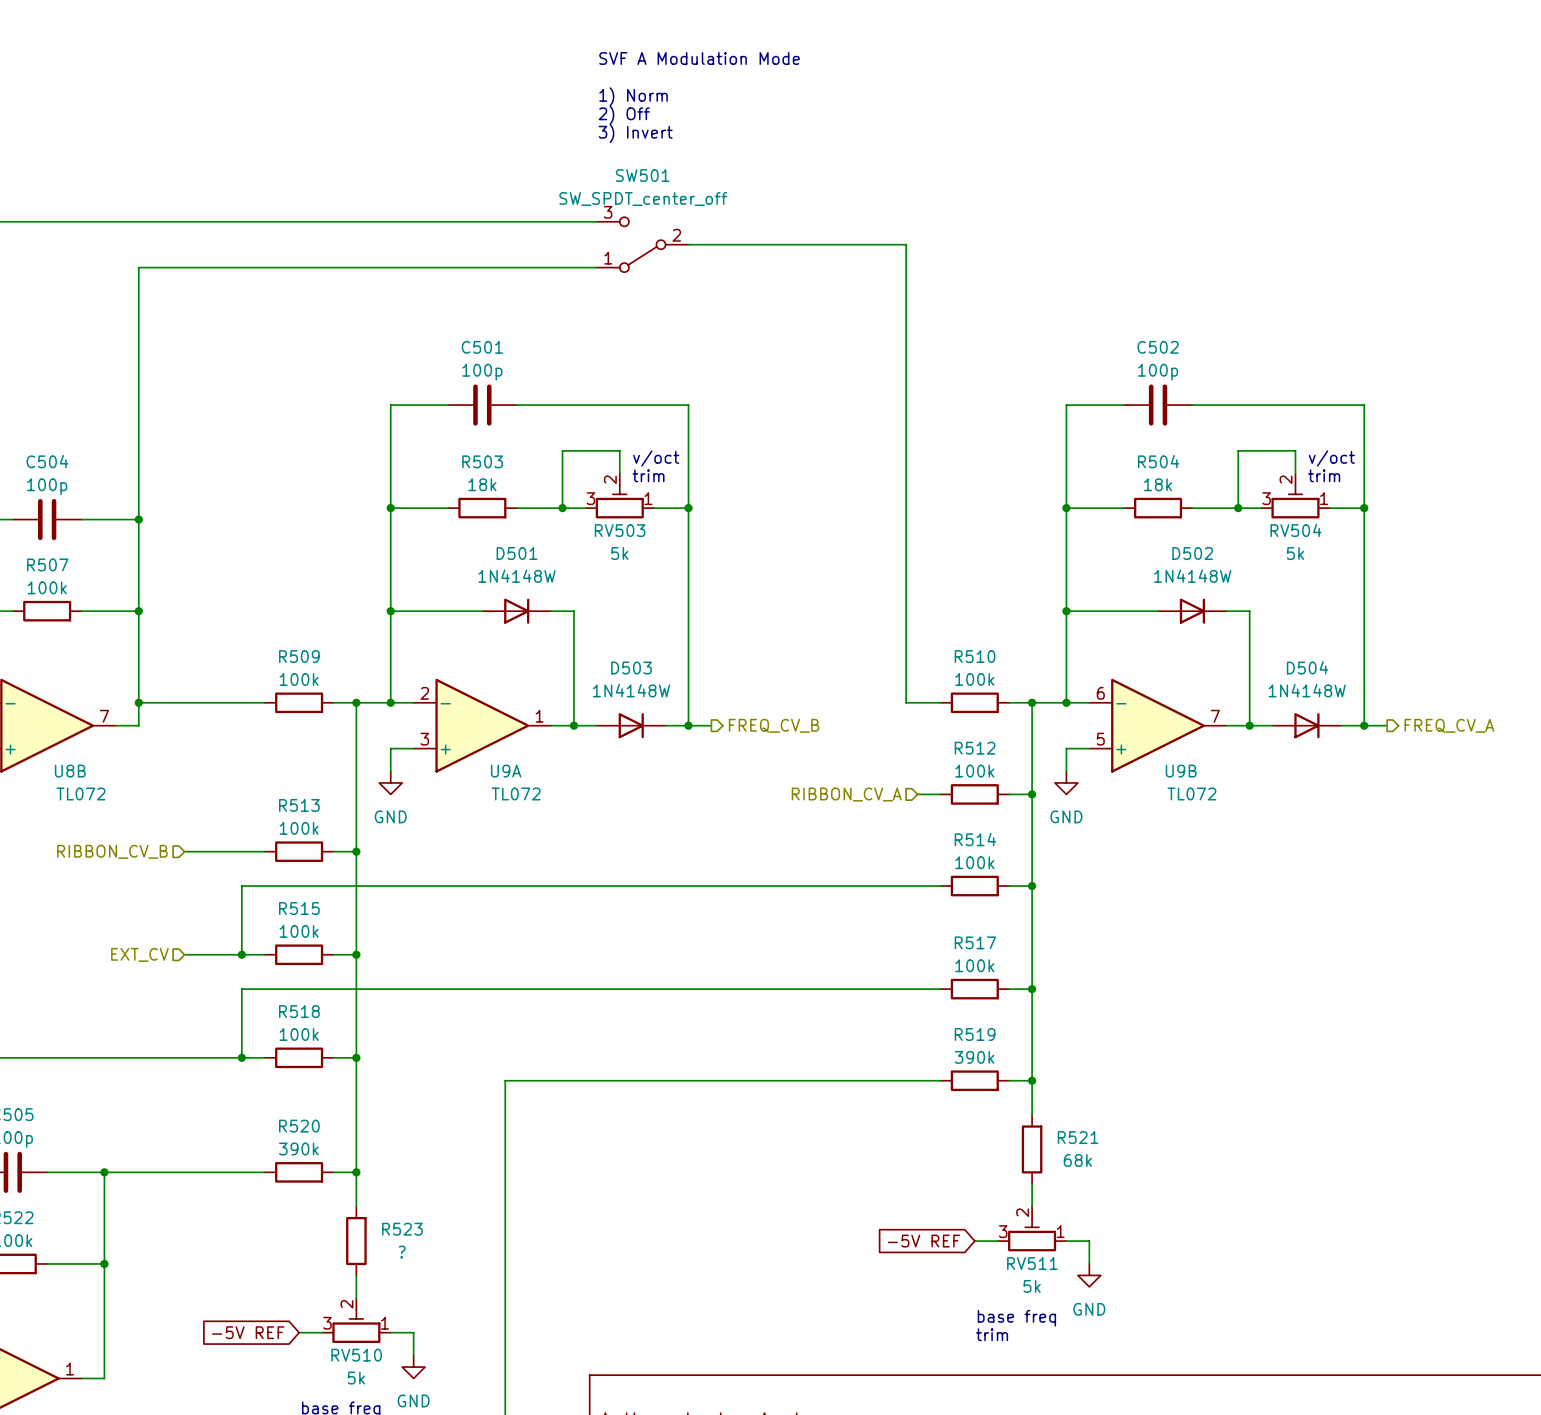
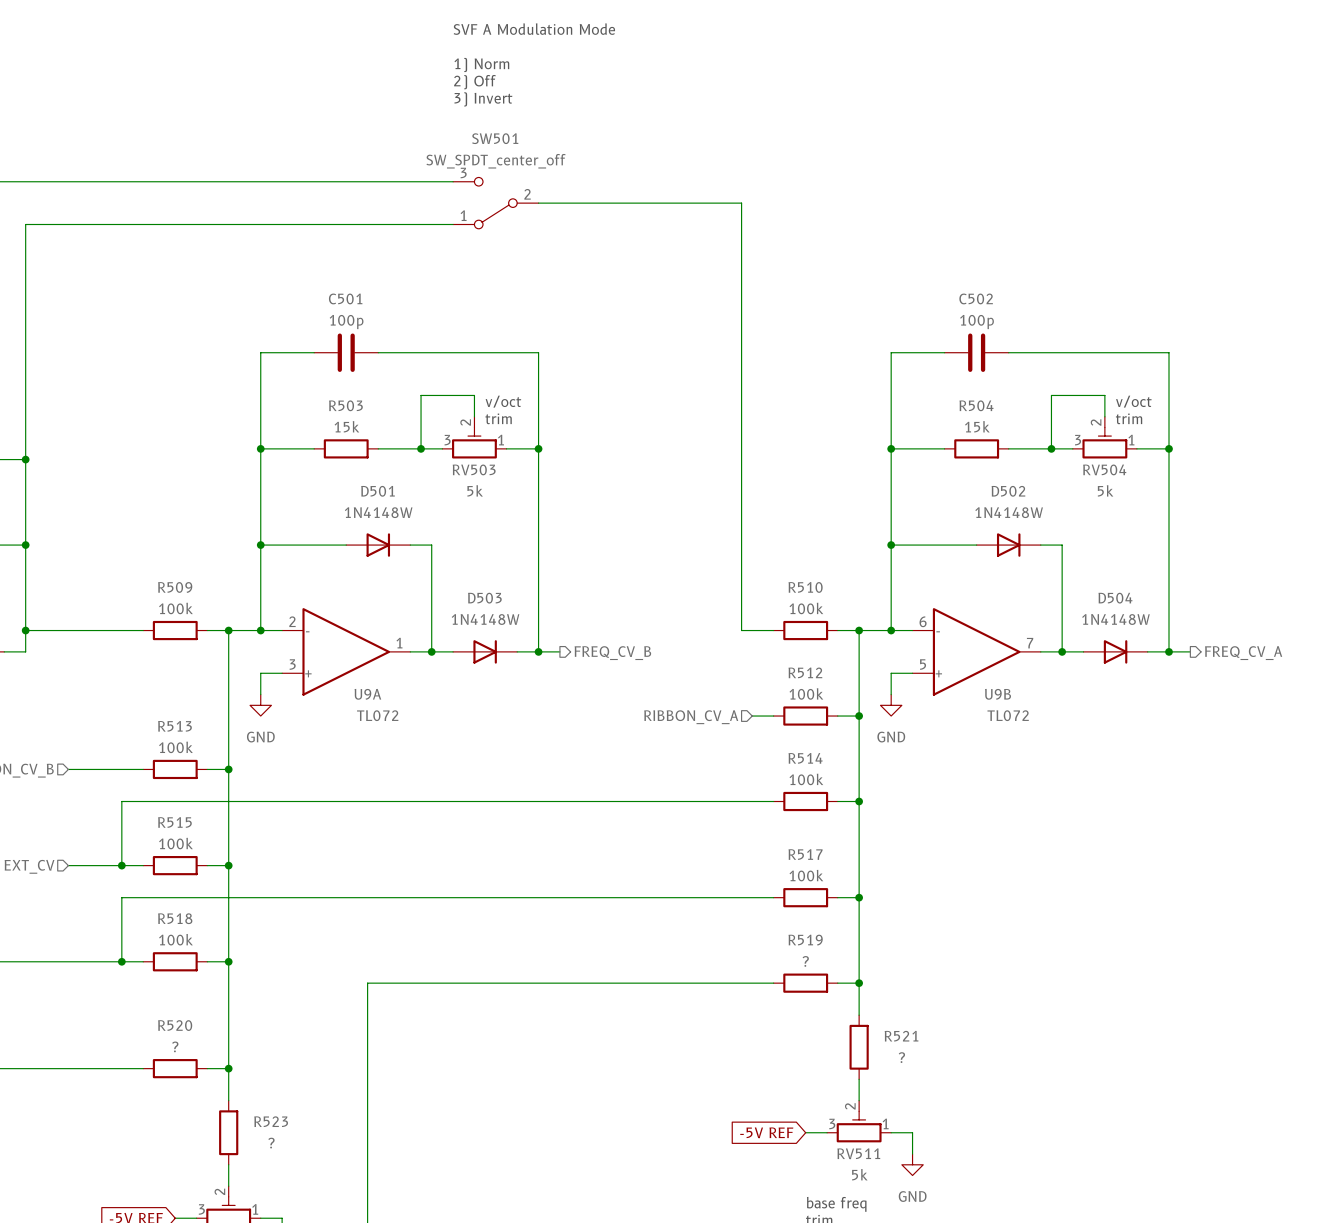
R503 value: 18k (482, 484) -> 15k (346, 426)
R504 value: 18k (1158, 484) -> 15k (977, 426)
R519 value: 390k (974, 1057) -> ? (805, 961)
R520 value: 390k (298, 1149) -> ? (175, 1046)
R521 value: 68k (1077, 1160) -> ? (901, 1057)

